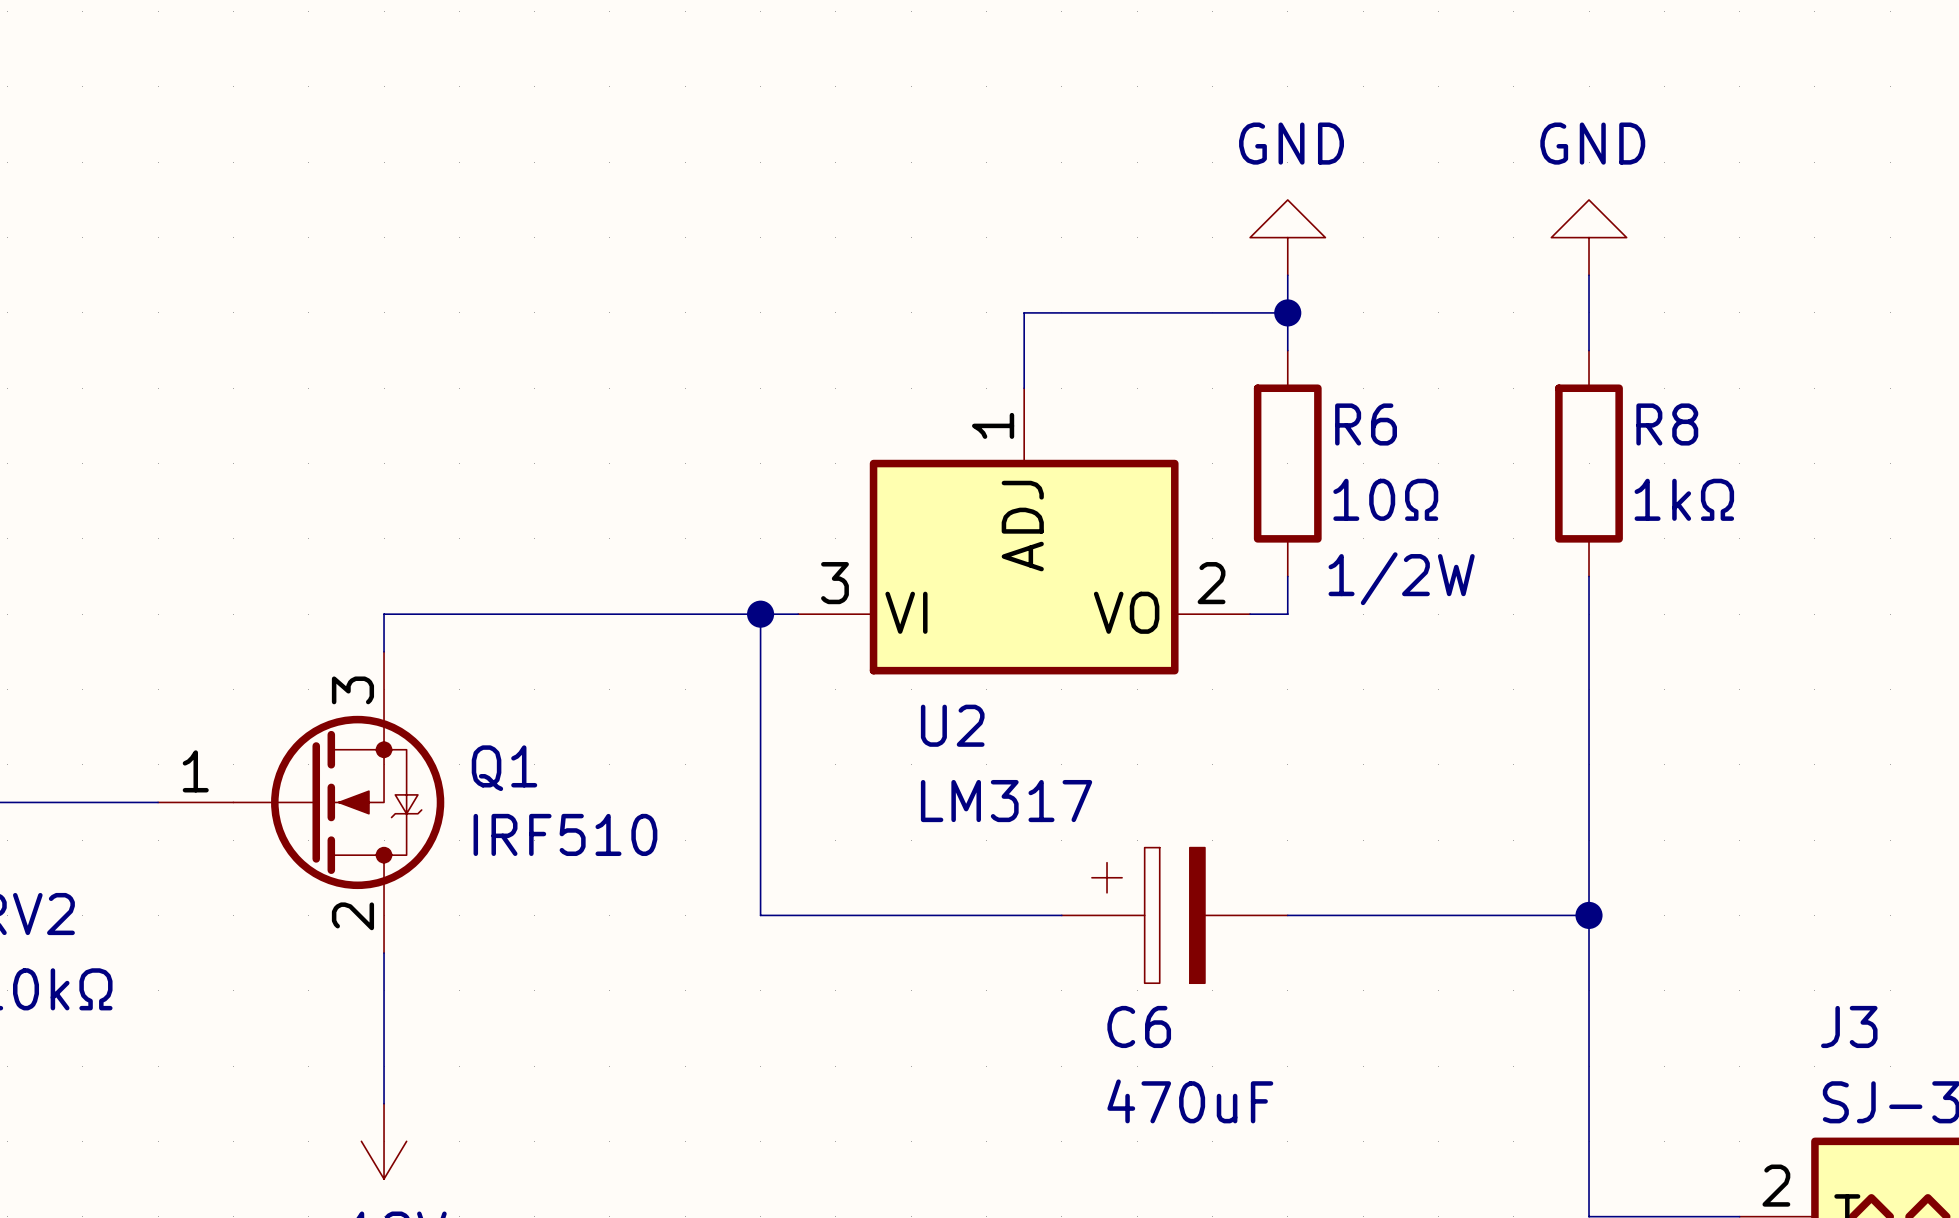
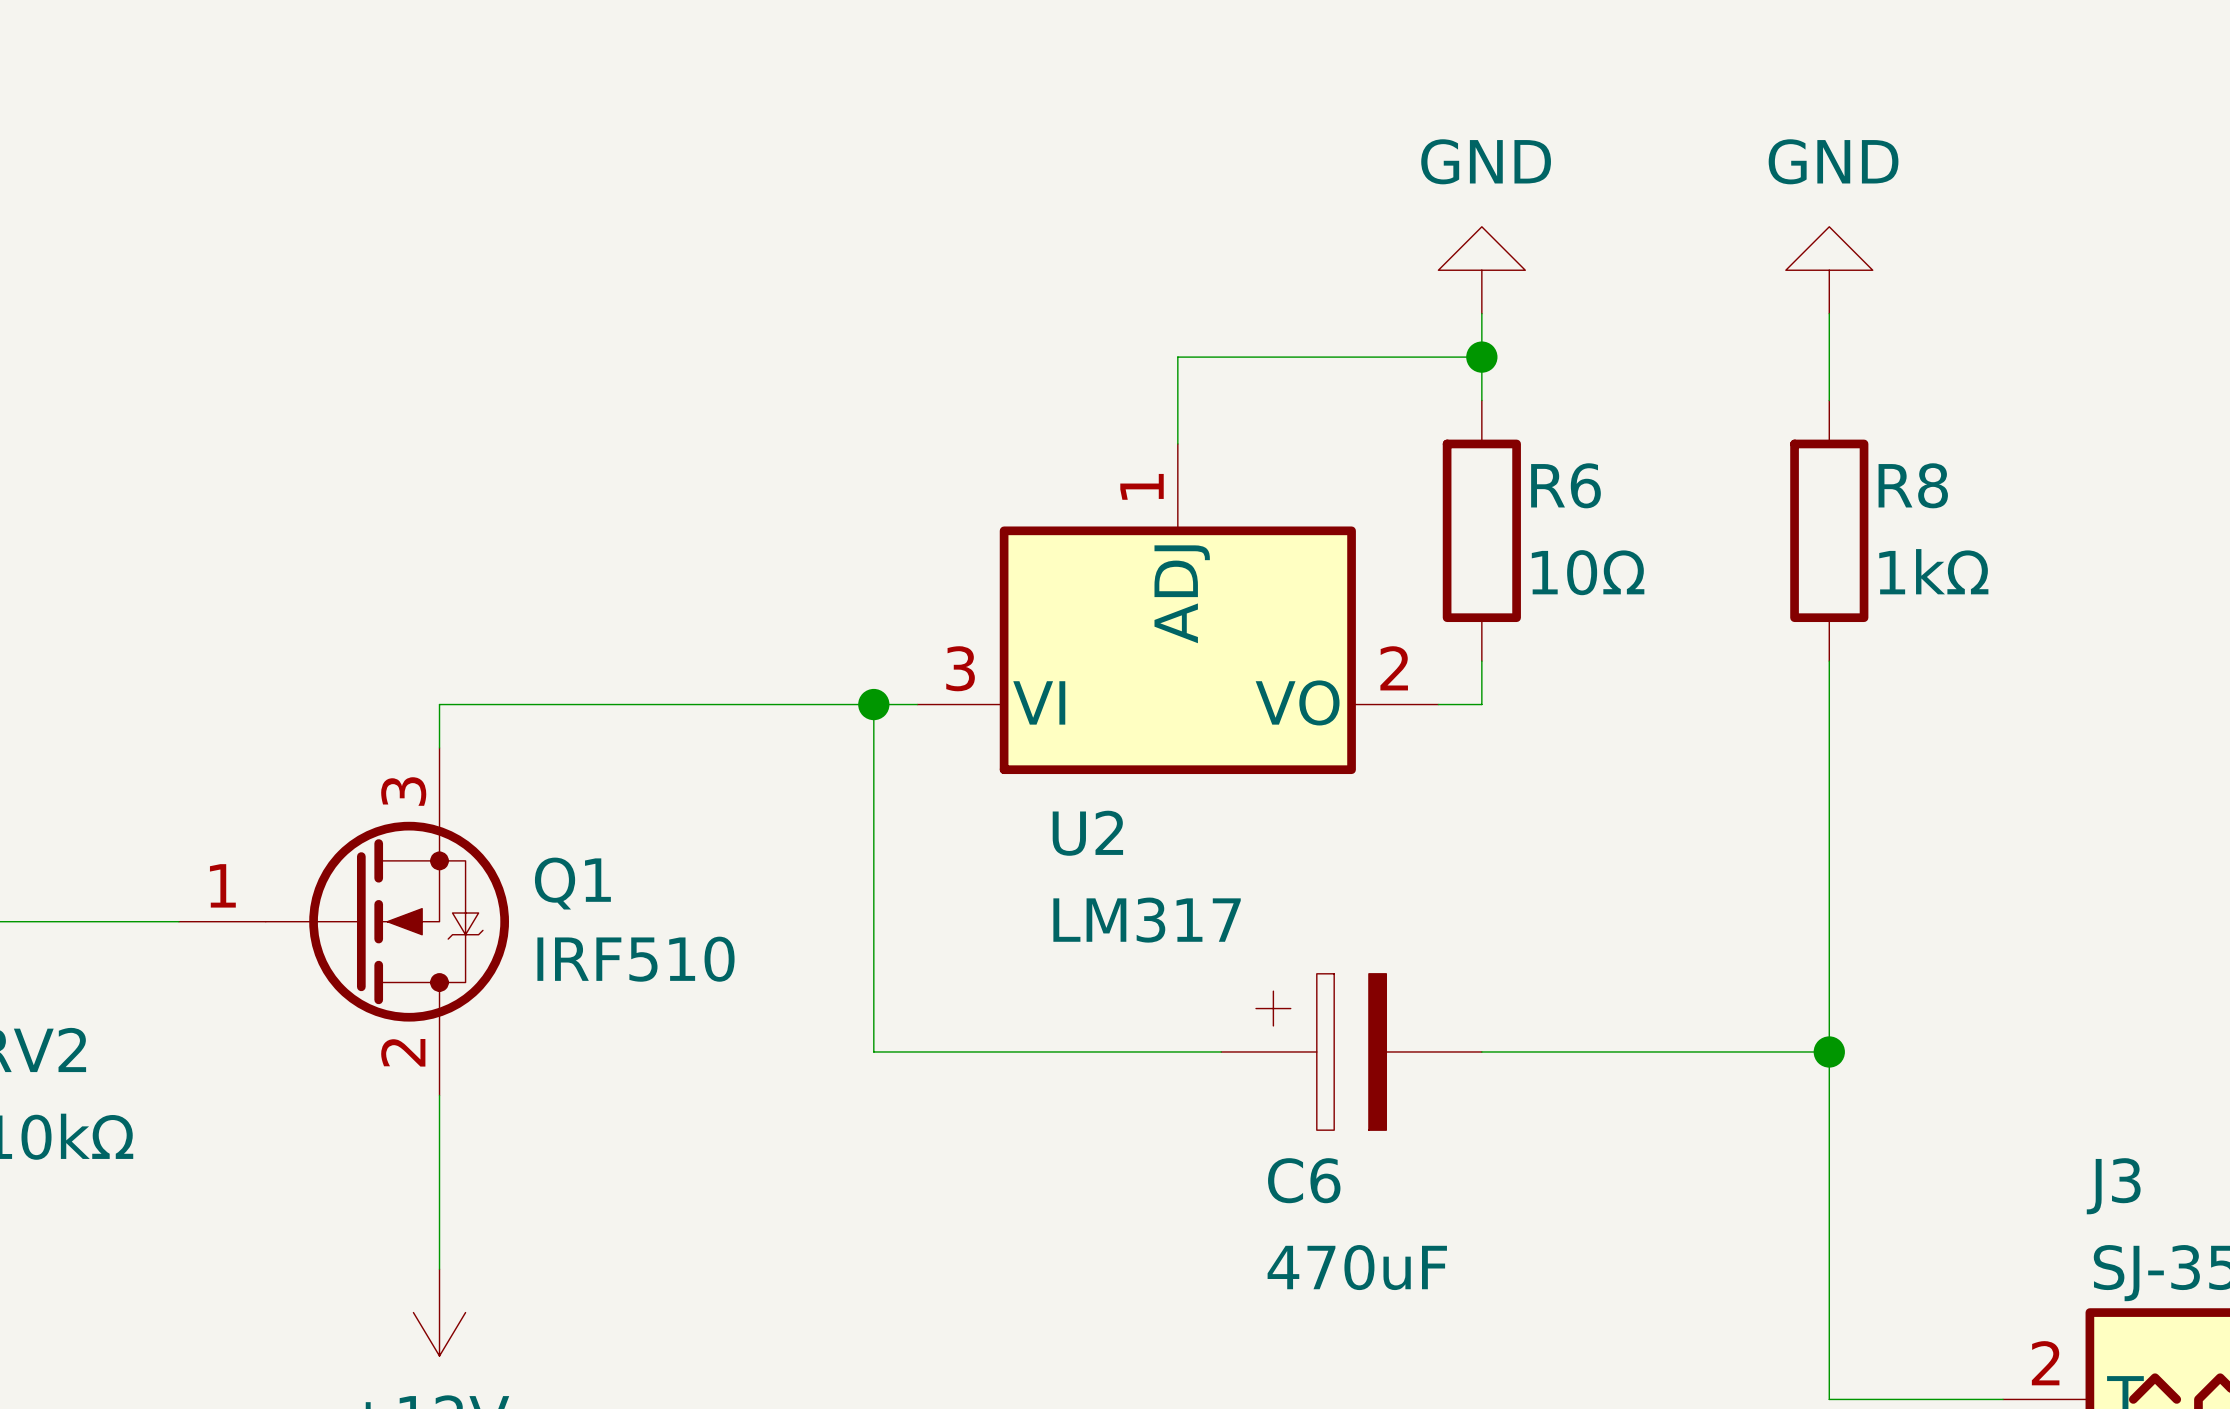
R6 text: 1/2W (1401, 578) -> none

